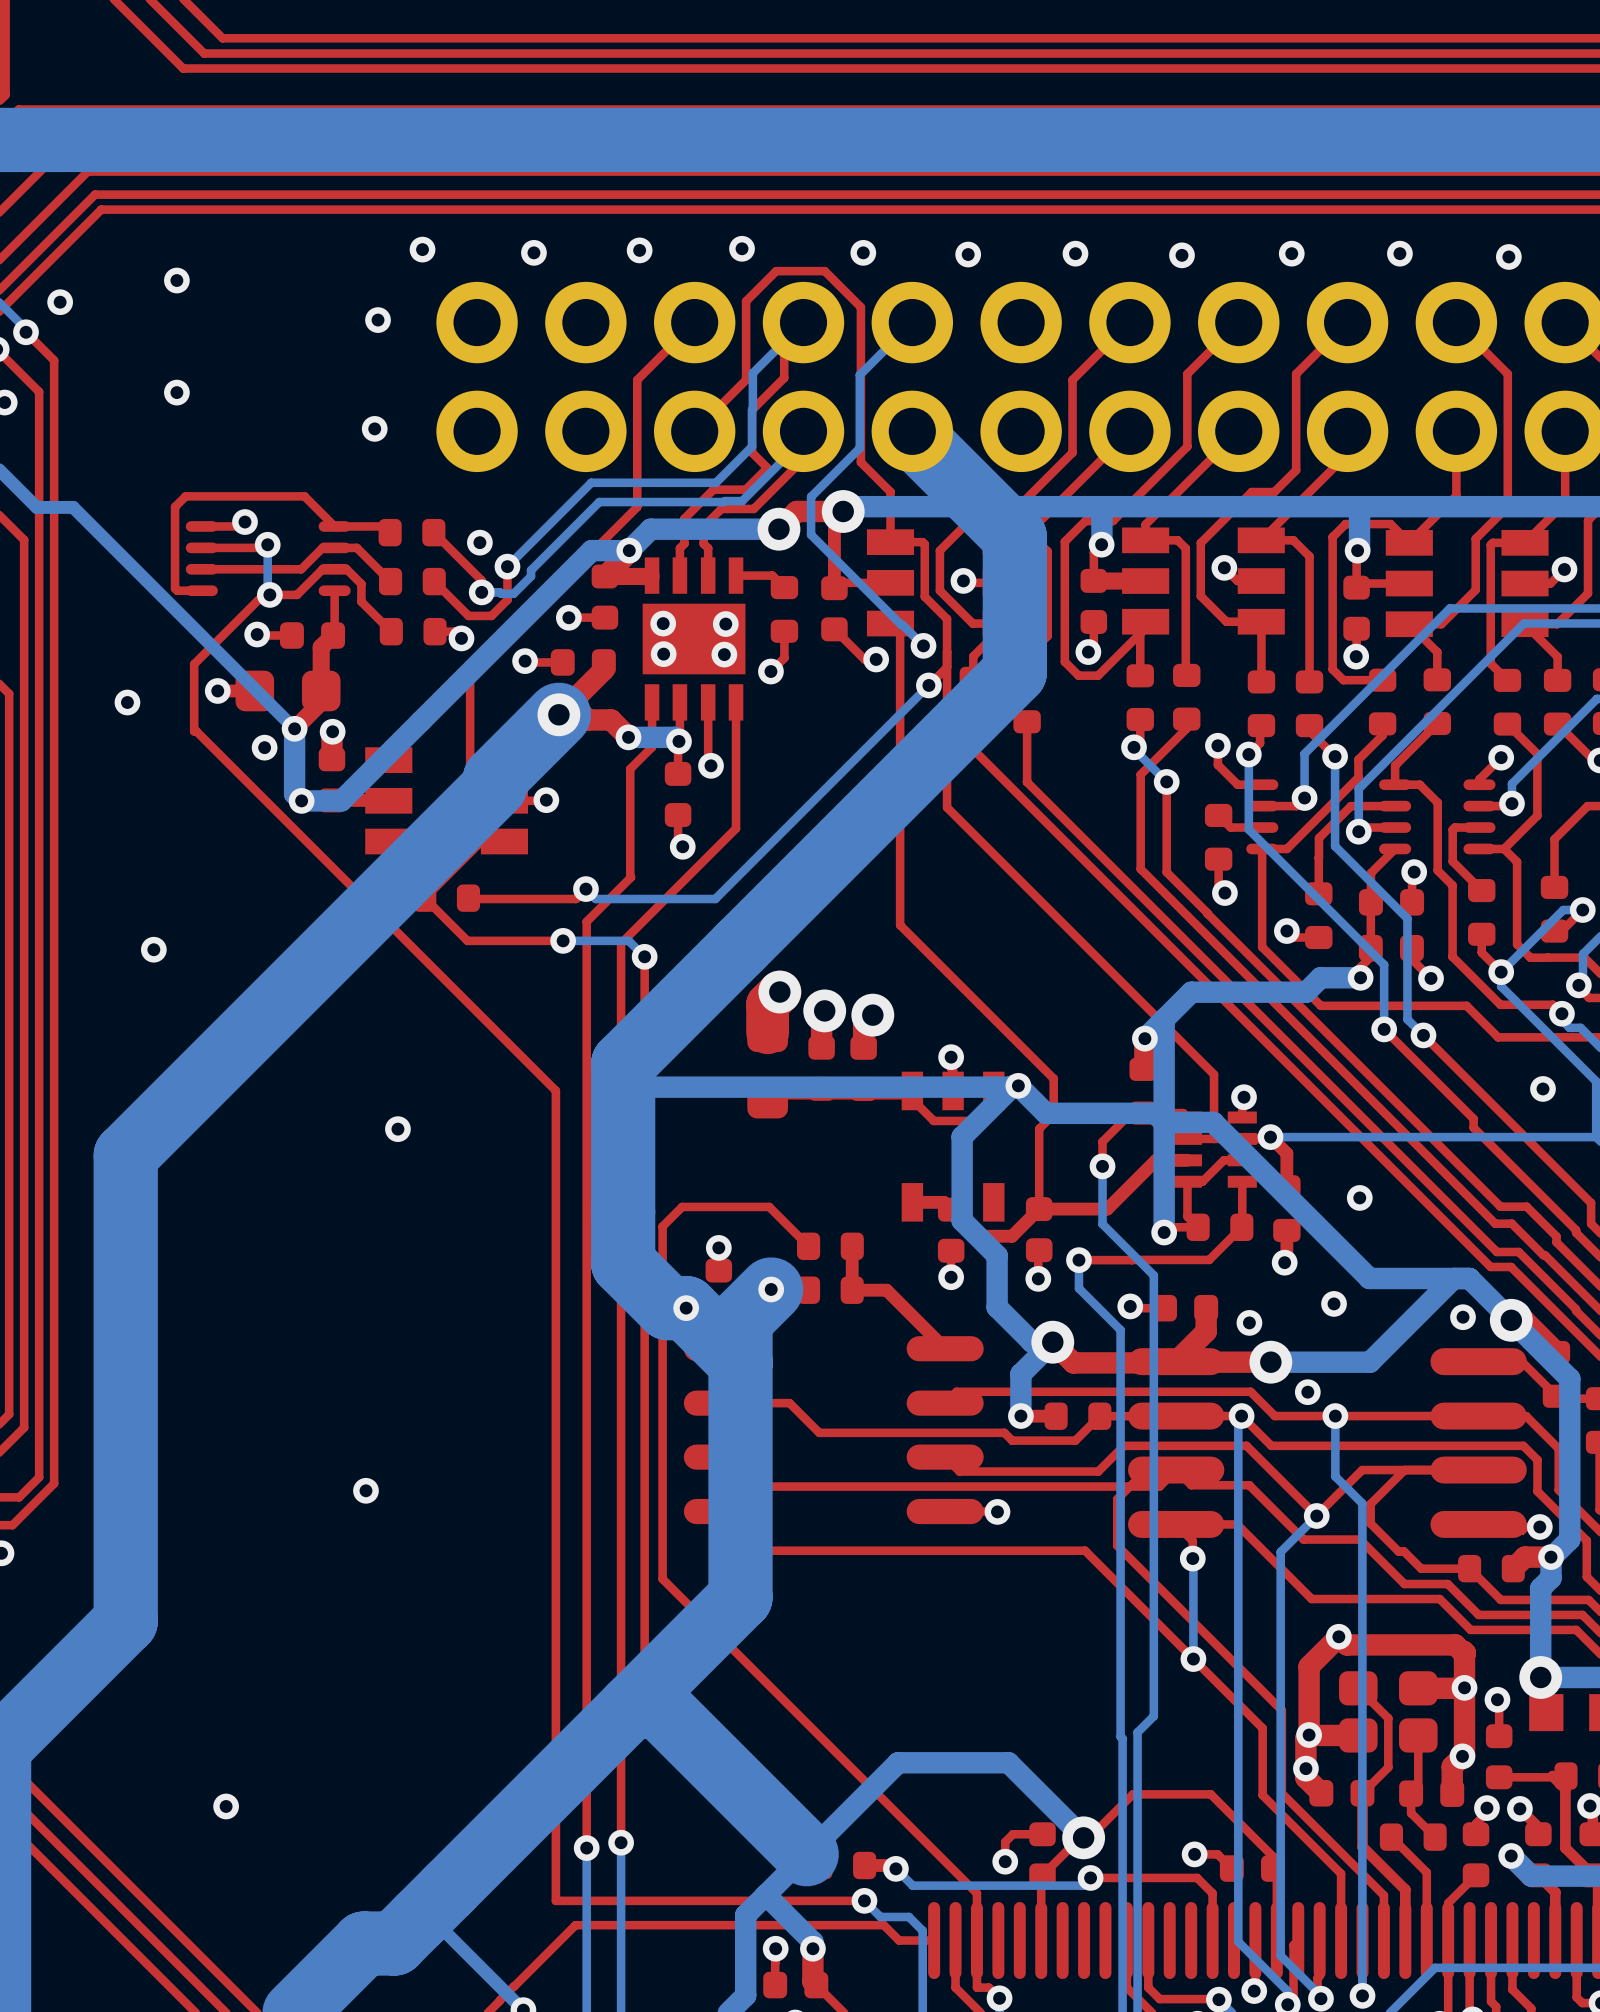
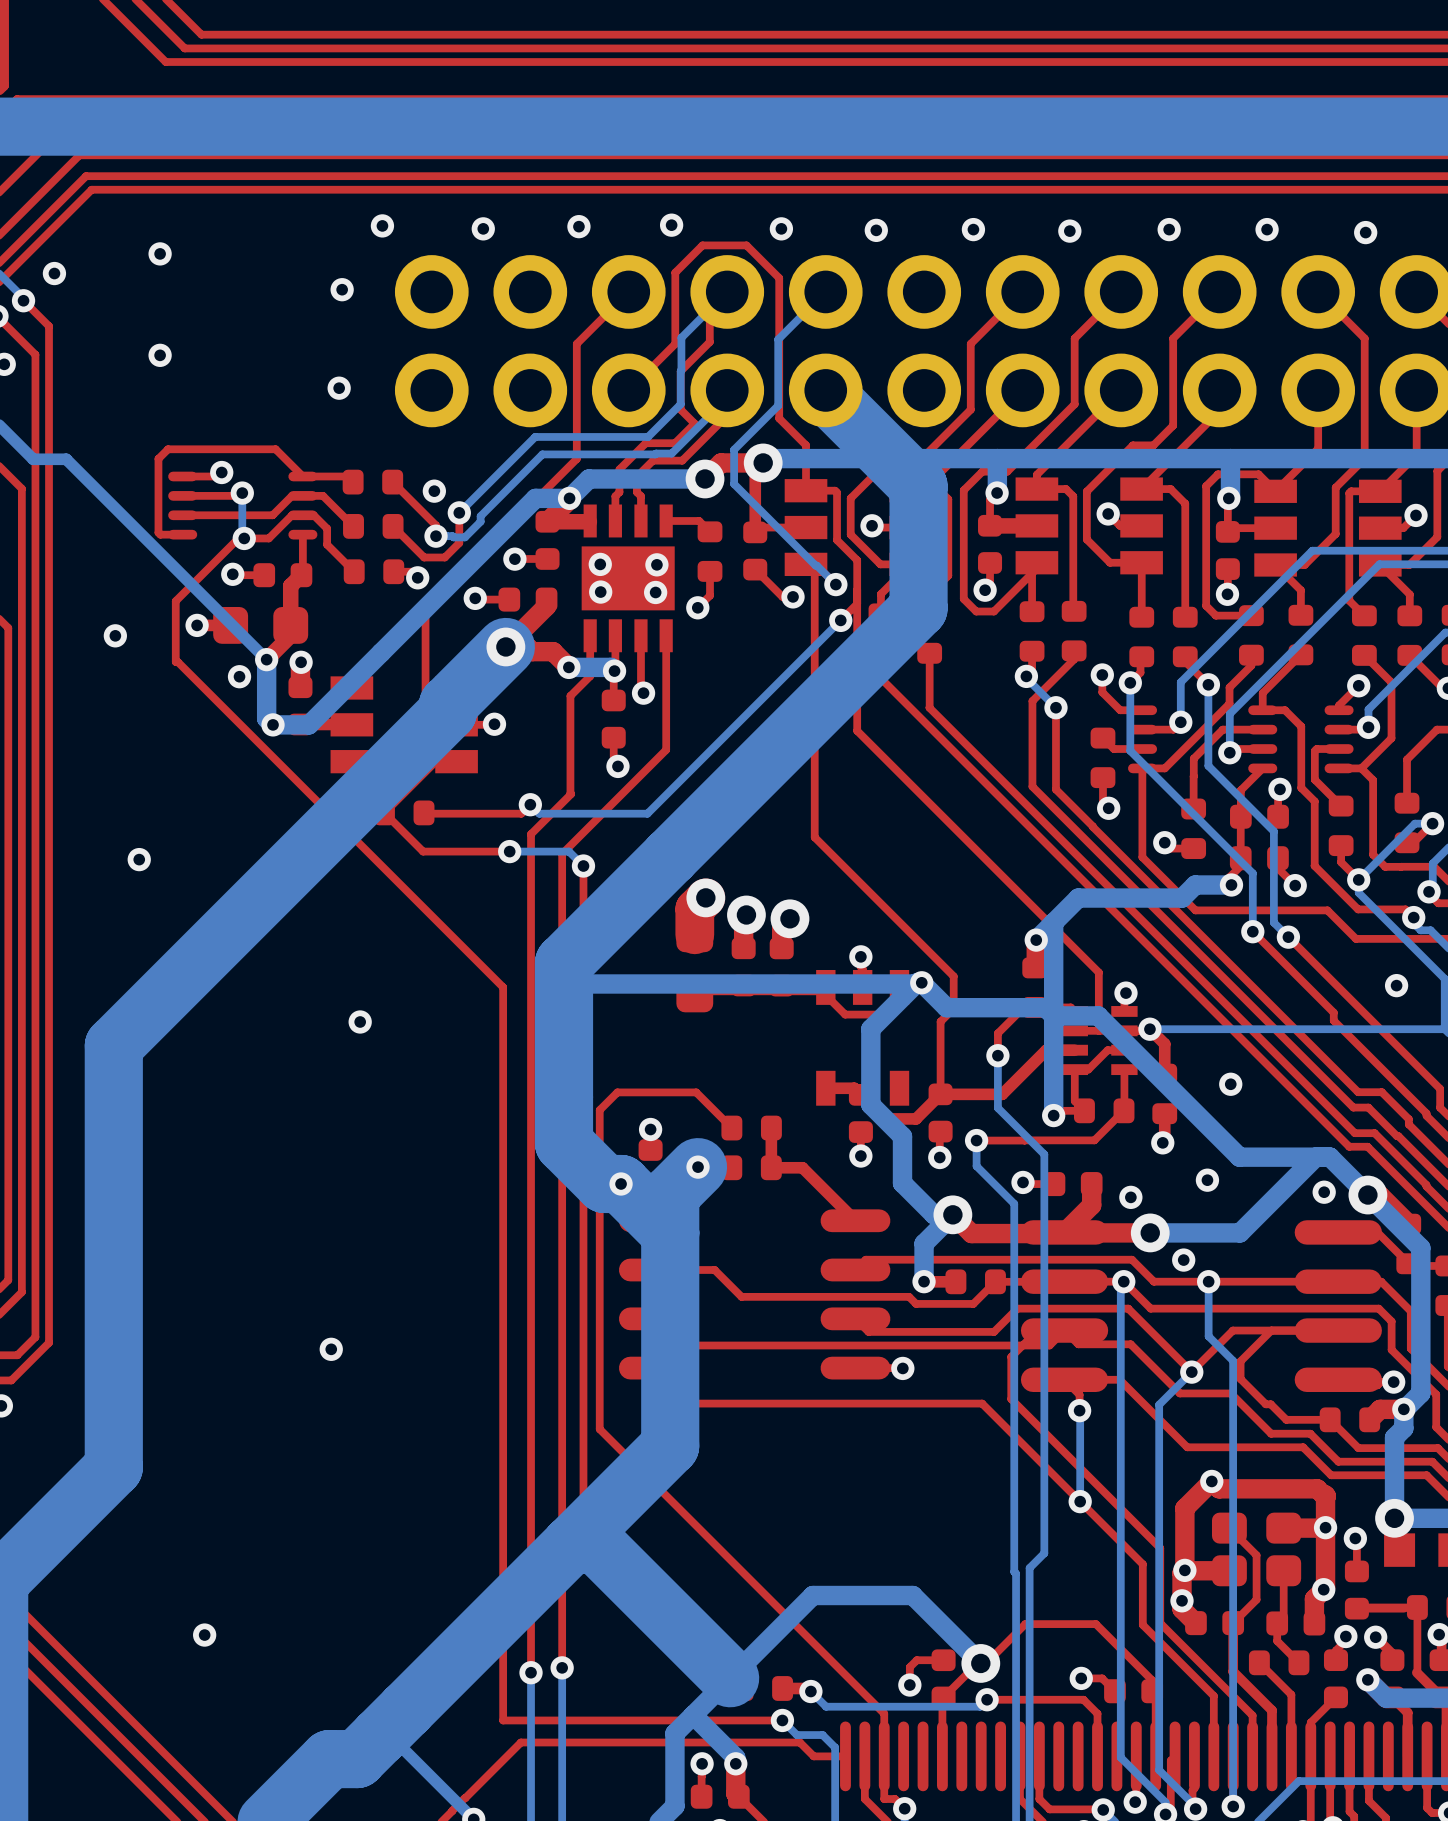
top track: (1552, 1776) (1565, 1788) (1565, 1847) -> (1356, 1608) (1417, 1607) (1417, 1673)

